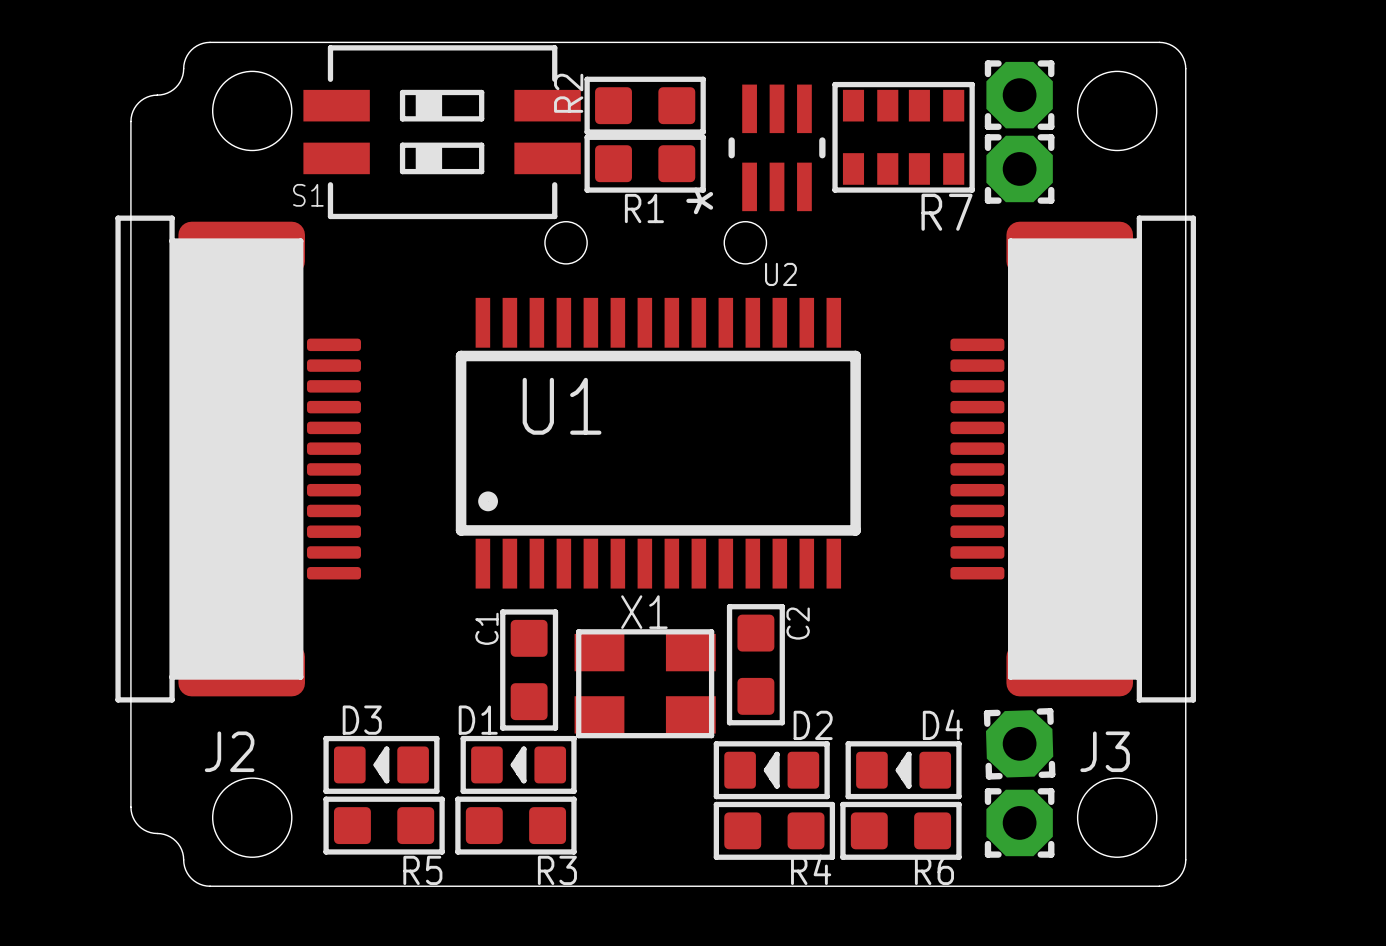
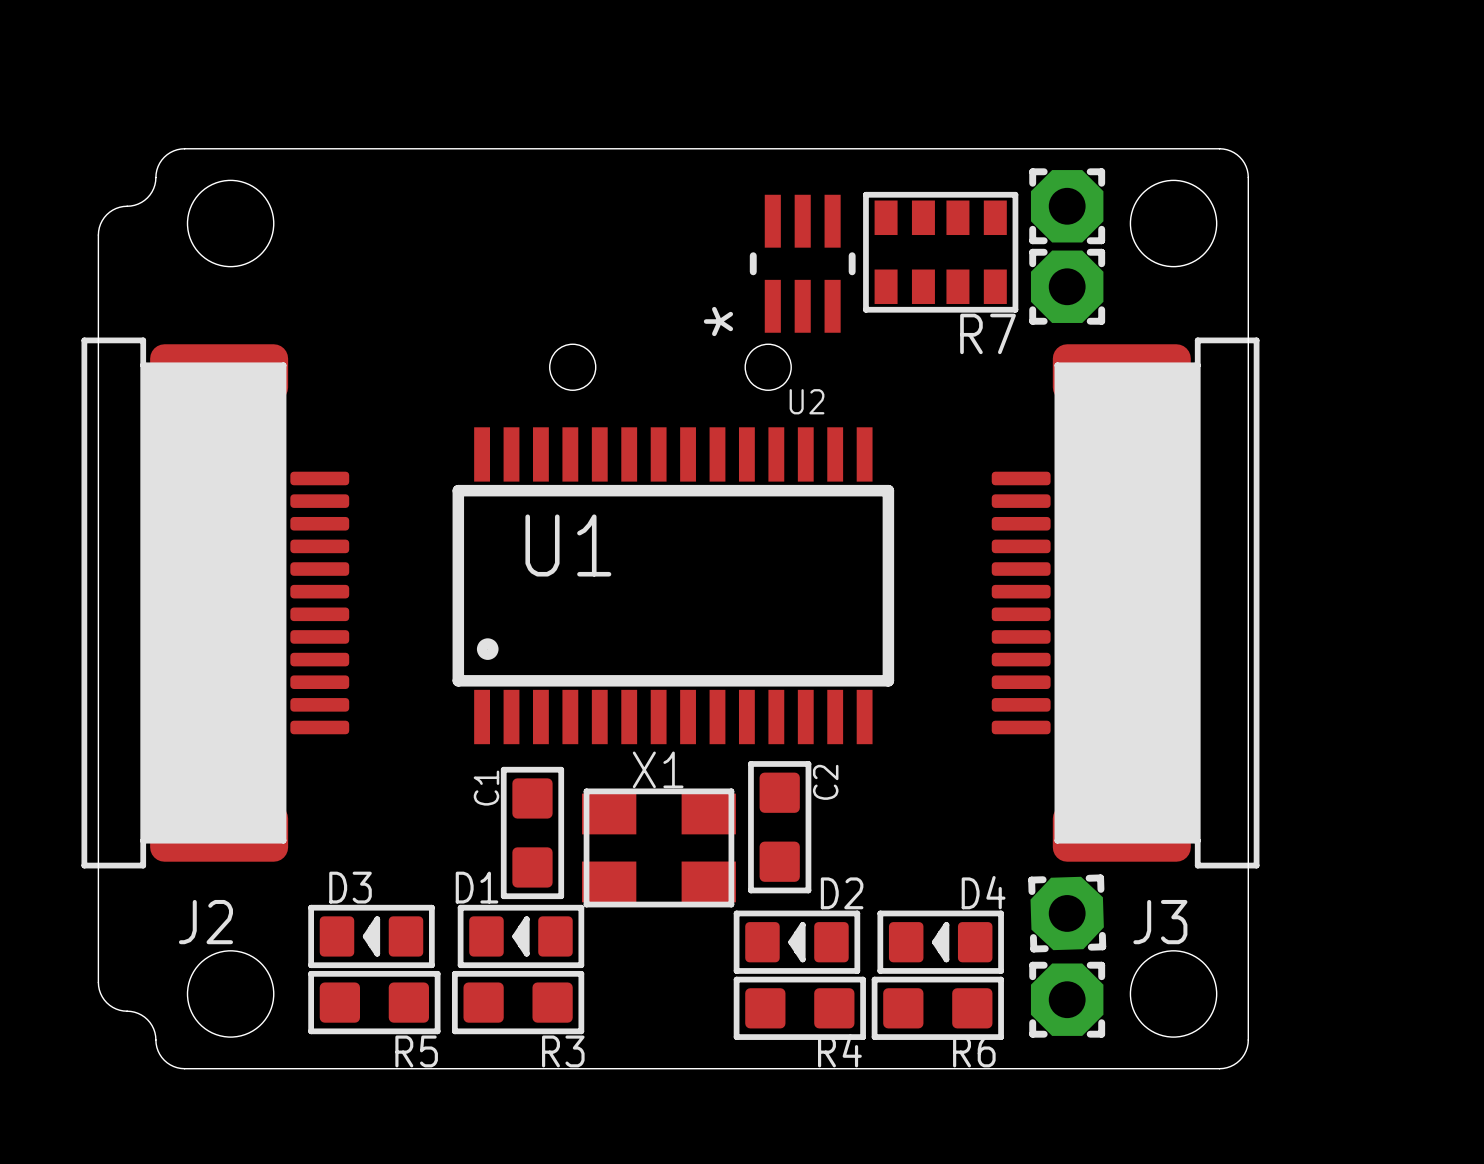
R2: (645, 105) -> none
S1: (442, 132) -> none
R1: (645, 163) -> none

